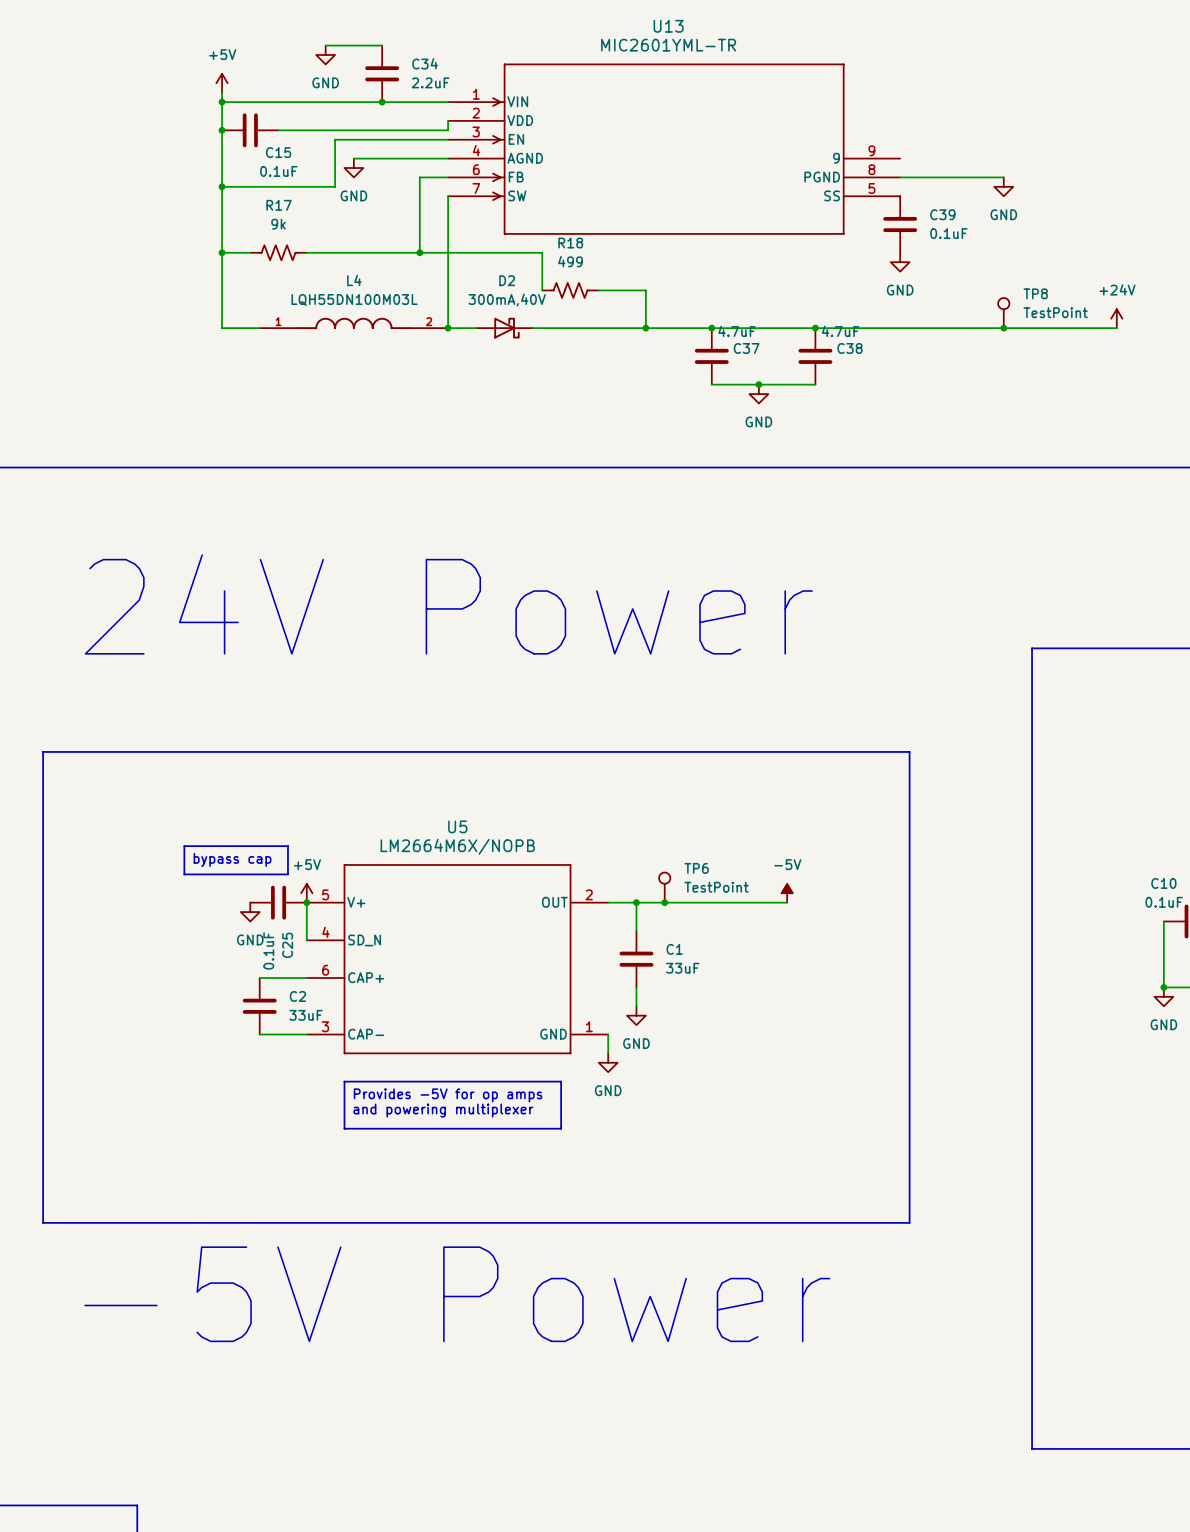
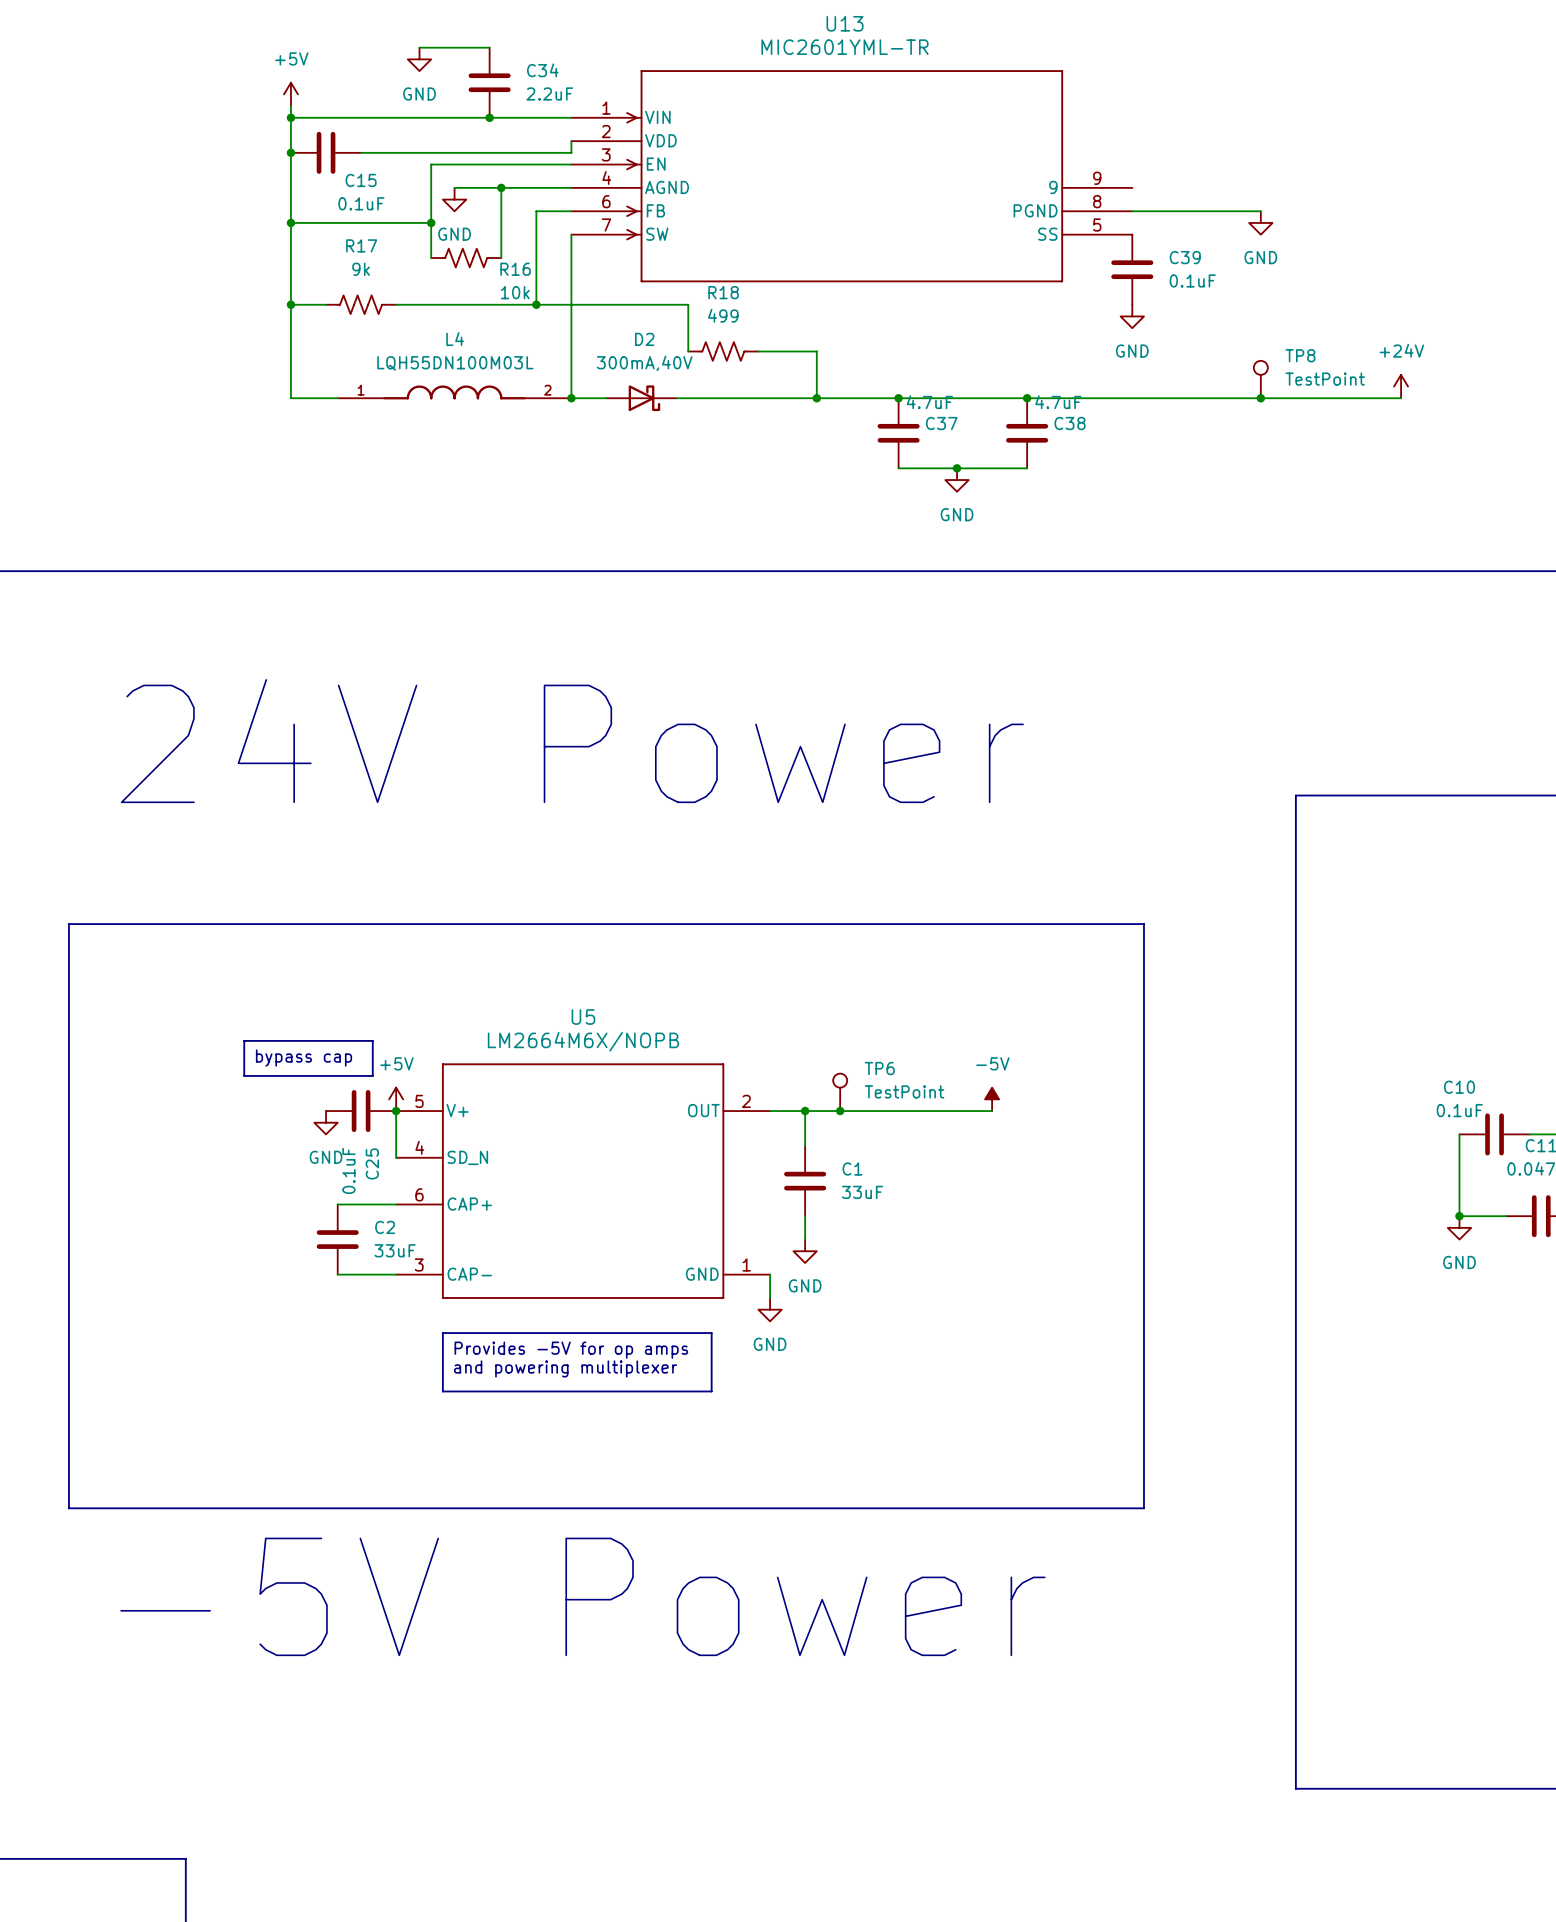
wire: none -> (501, 187) (501, 258)
junction: none -> (501, 187)
wire: none -> (431, 222) (431, 258)
junction: none -> (431, 222)
R16: none -> 10k (466, 258)

